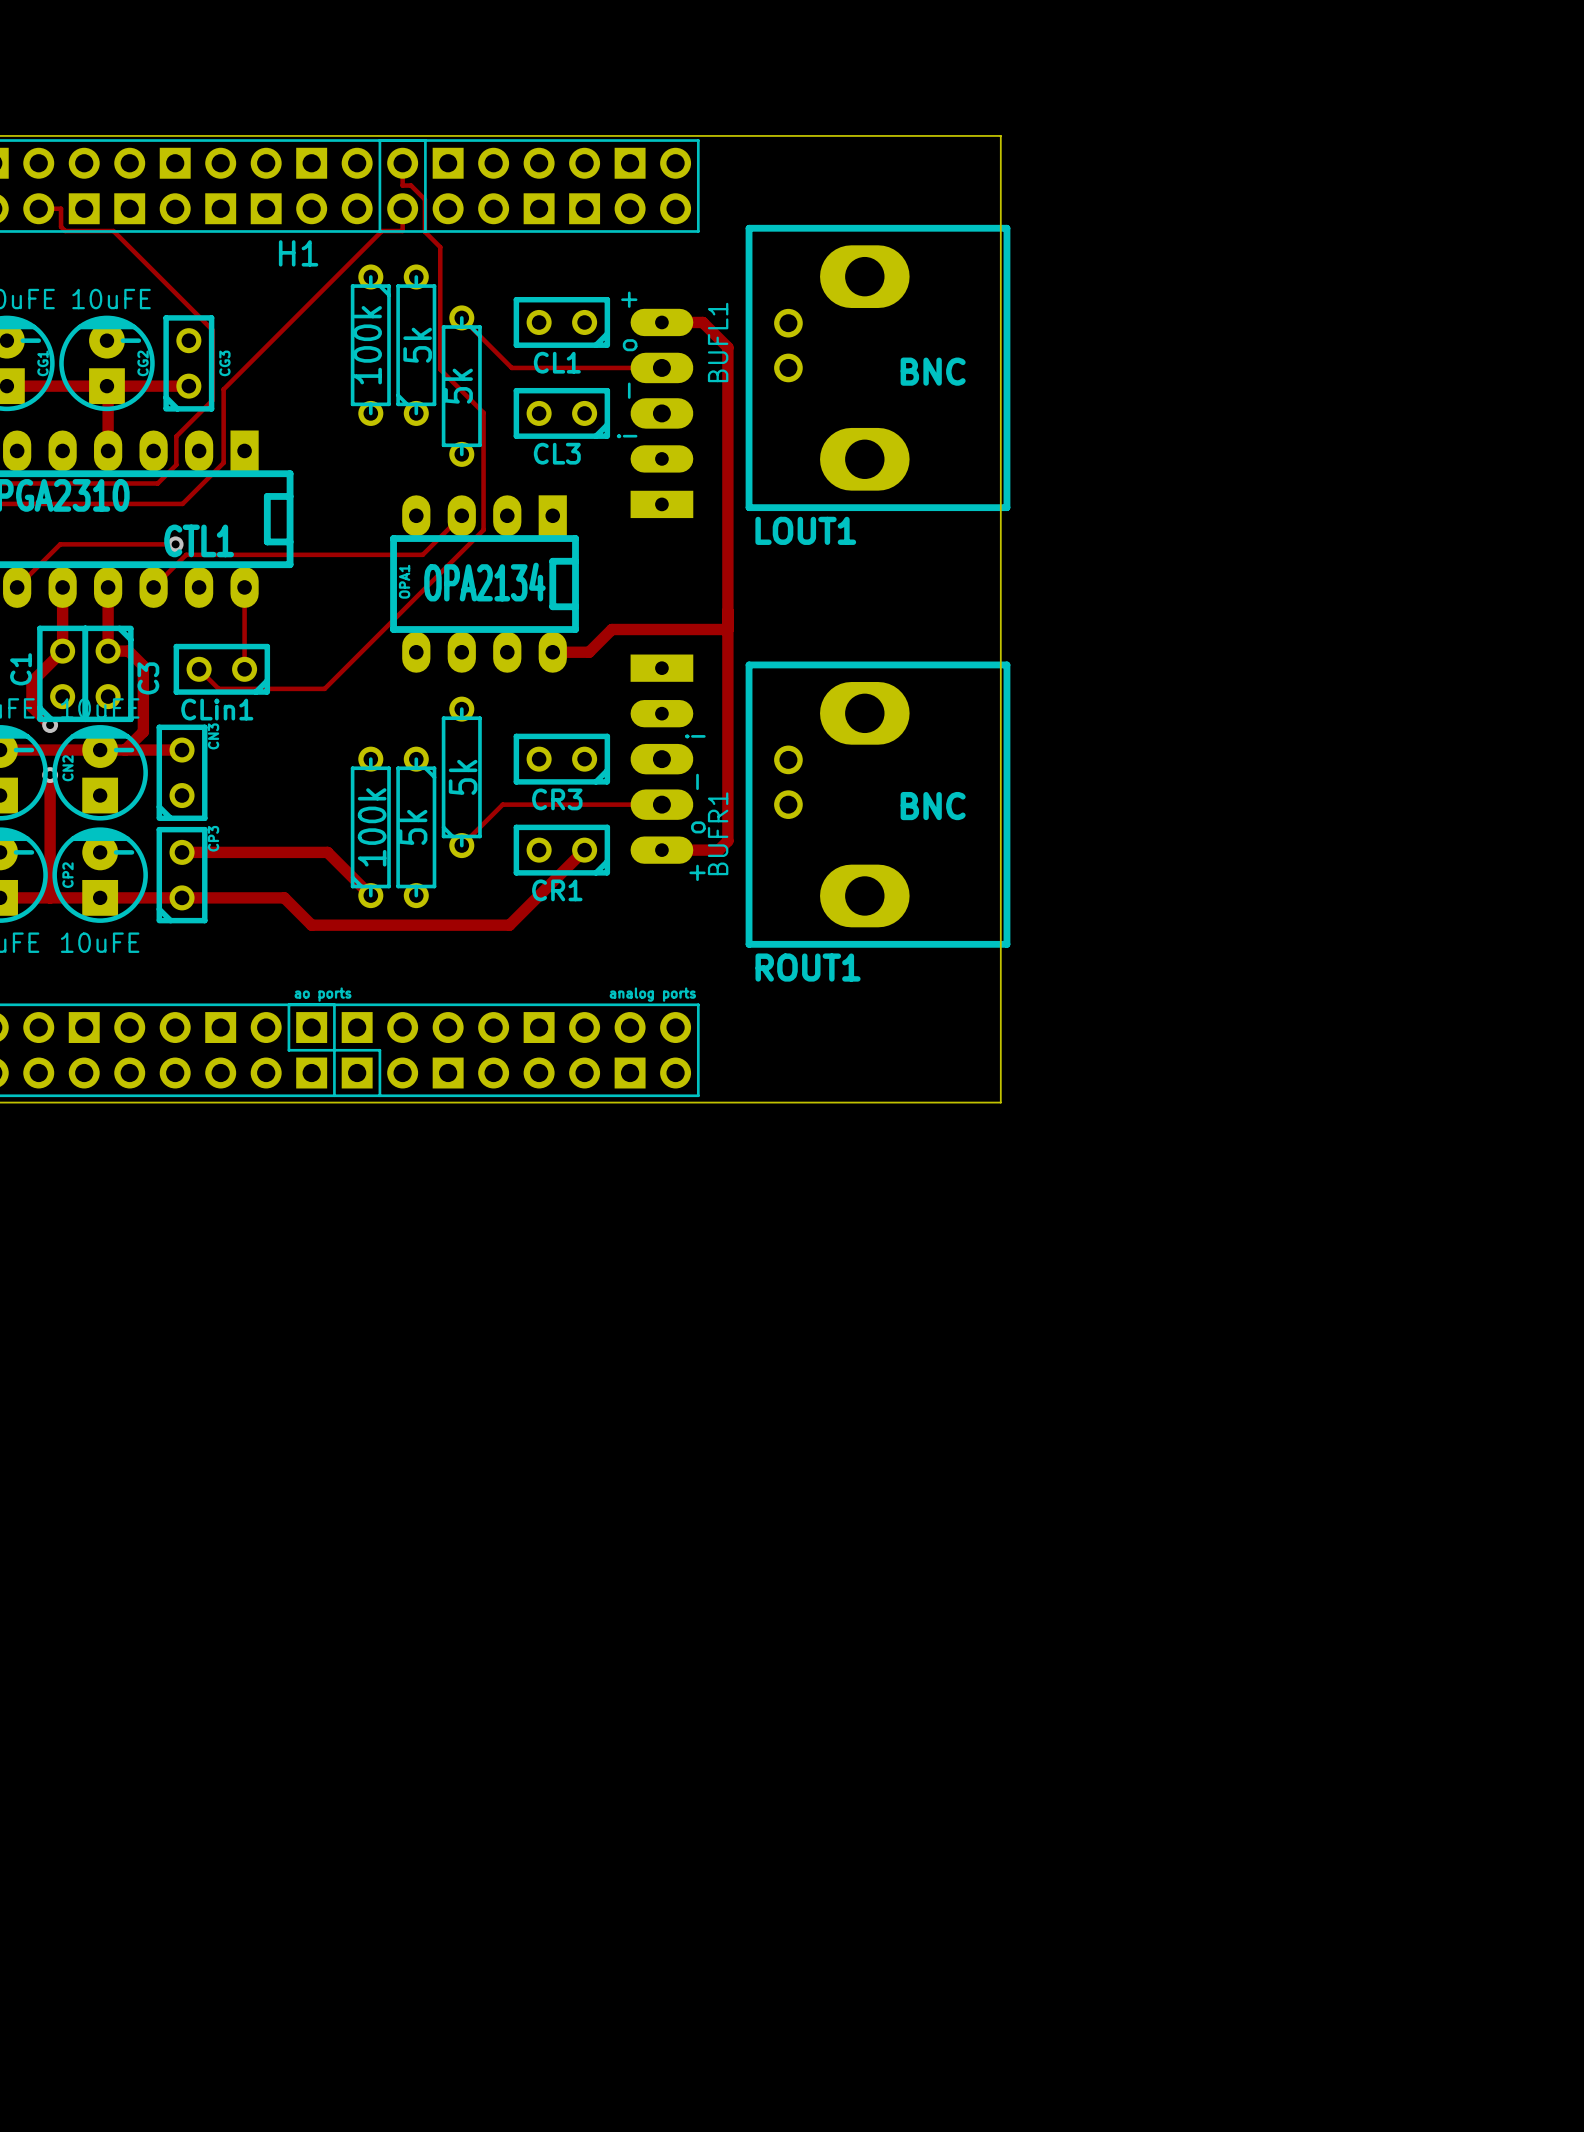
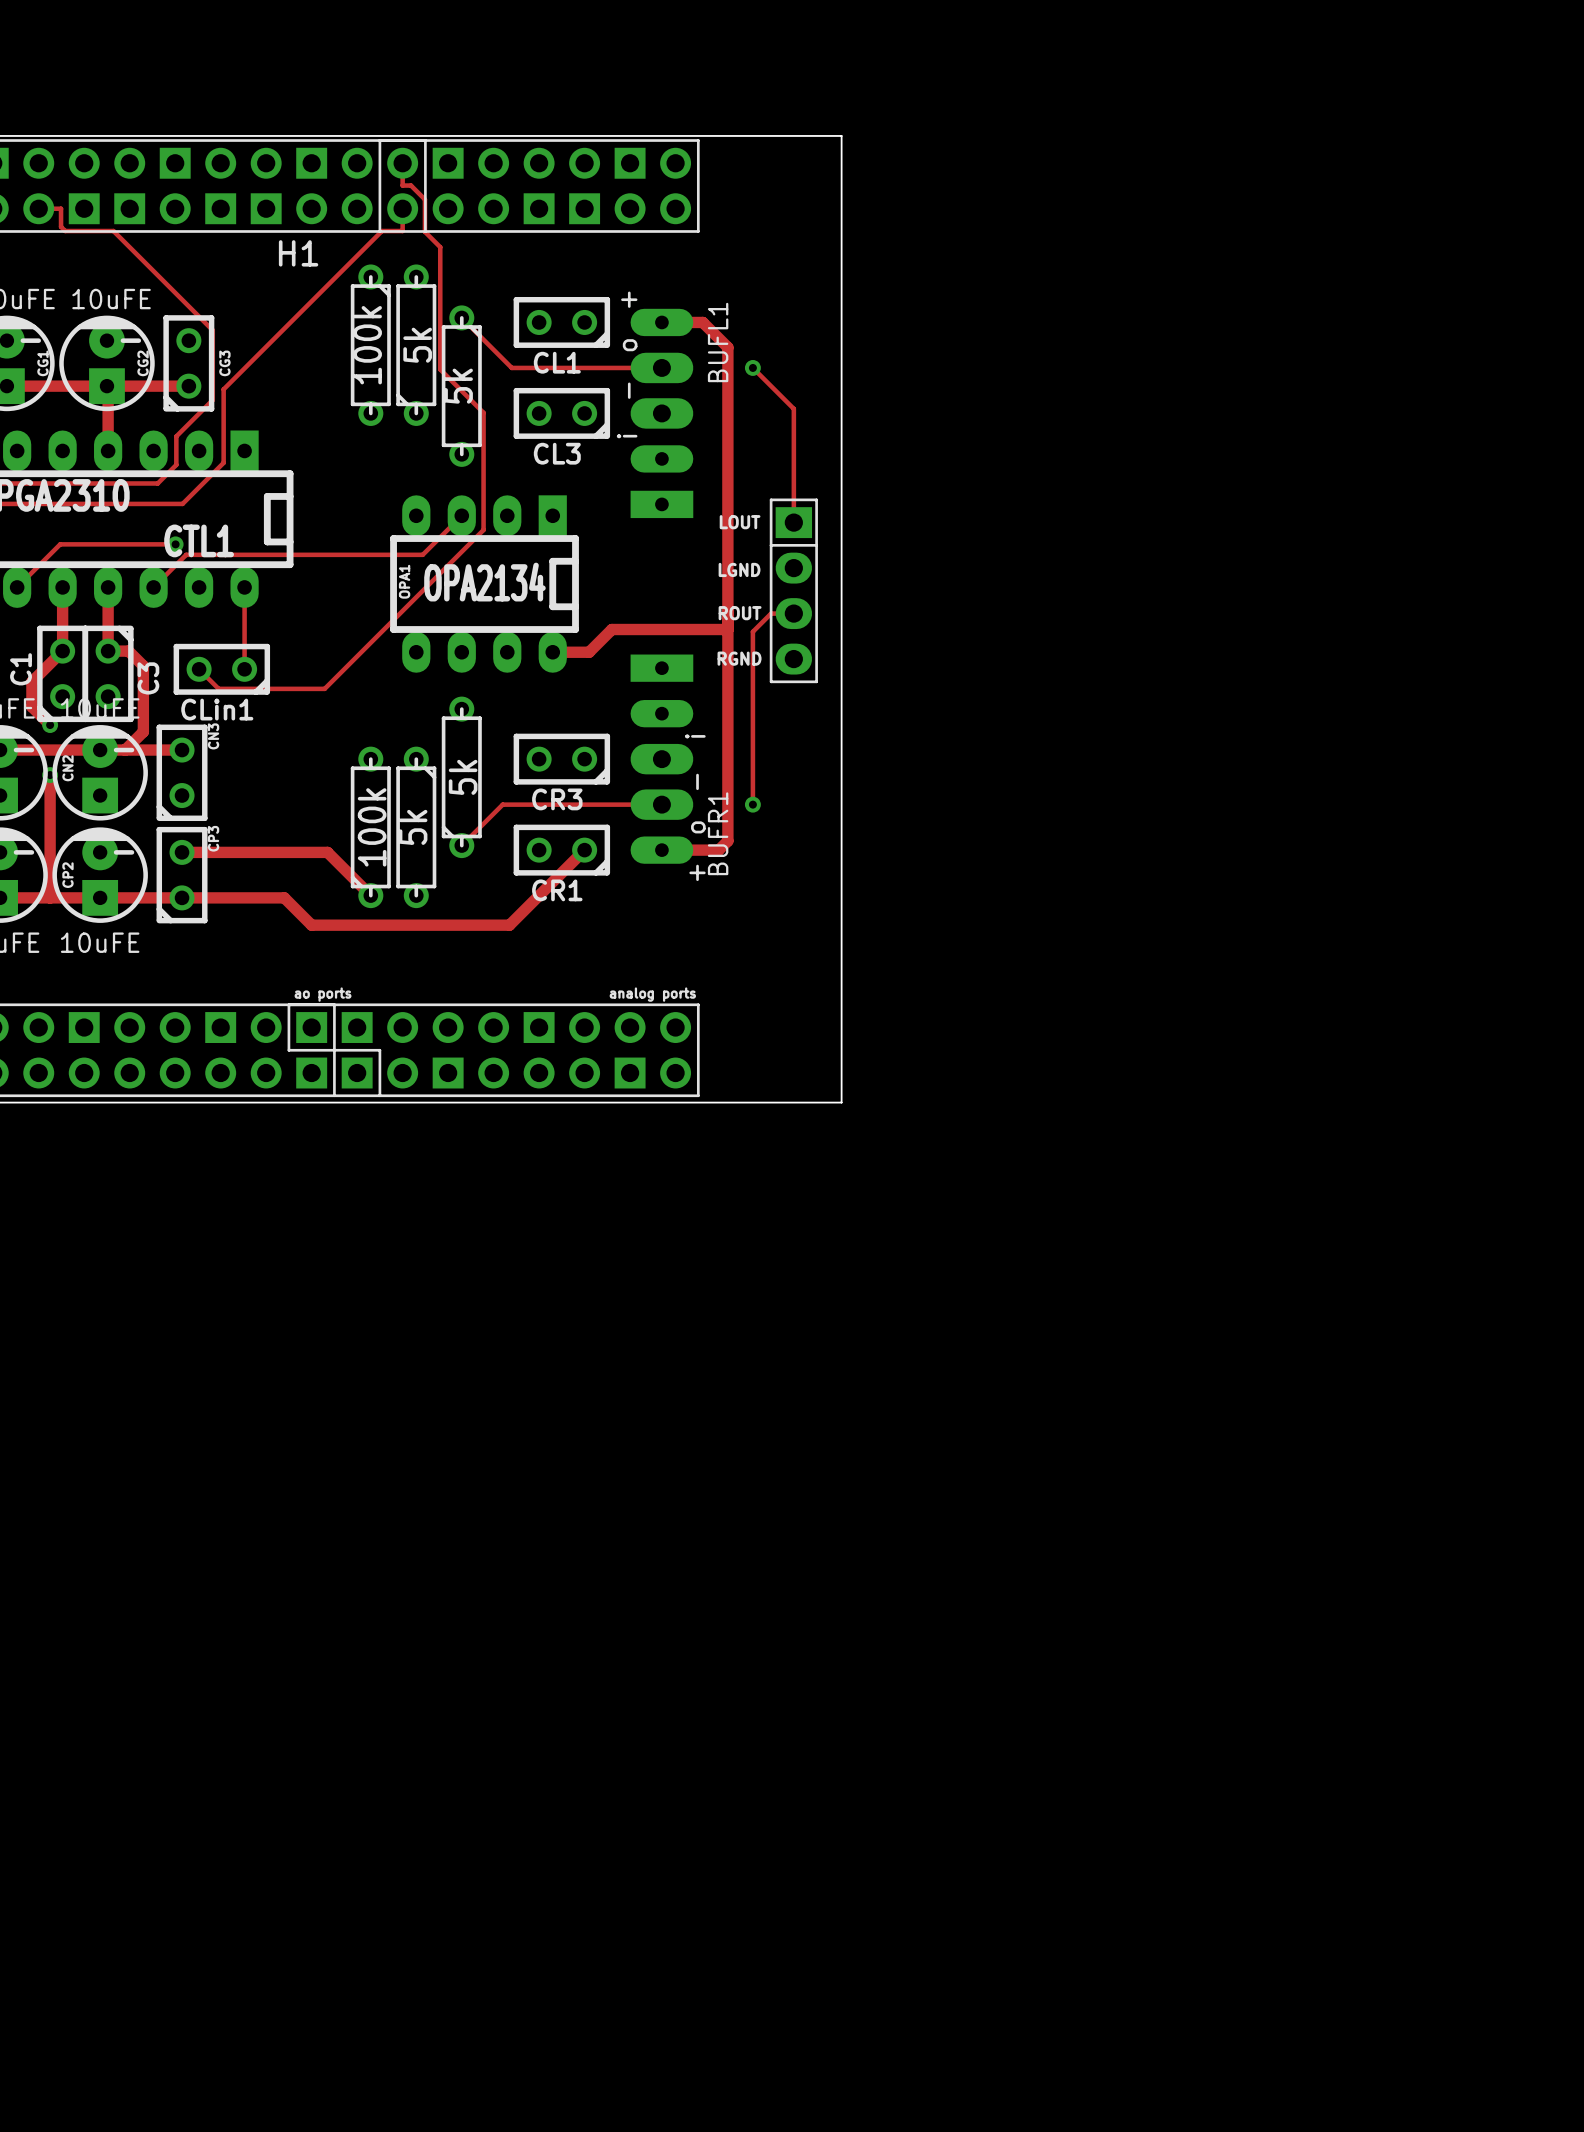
board edge: (841, 135) (1000, 135) (1000, 1102) (841, 1102) -> (841, 135) (841, 1102)
track: none -> (752, 367) (793, 408) (793, 522)
via: none -> (752, 367)
LOUT1: BNC (878, 367) -> none
text: none -> LOUT (740, 522)
text: none -> LGND (739, 569)
part: none -> (793, 590)
text: none -> ROUT (740, 613)
track: none -> (793, 613) (771, 613) (752, 631) (752, 804)
text: none -> RGND (739, 658)
via: none -> (752, 804)
ROUT1: BNC (878, 804) -> none

